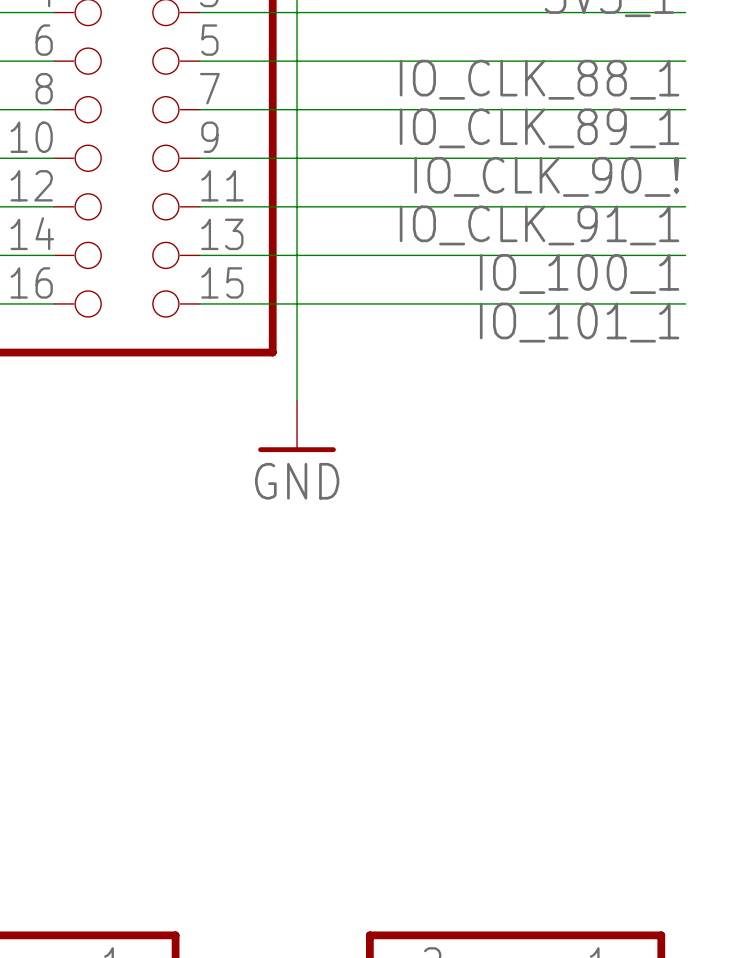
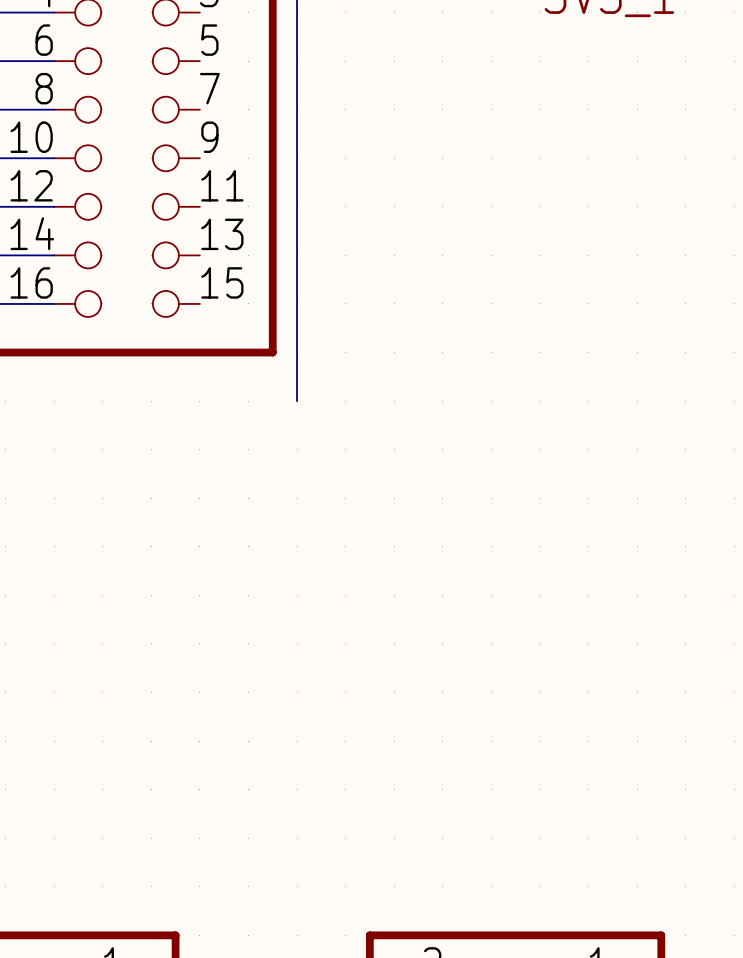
wire: (199, 12) (685, 12) -> none
wire: (199, 61) (685, 61) -> none
label: IO_CLK_88_1 (539, 79) -> none
wire: (199, 109) (685, 109) -> none
label: IO_CLK_89_1 (539, 128) -> none
wire: (199, 158) (685, 158) -> none
label: IO_CLK_90_! (546, 176) -> none
wire: (199, 206) (685, 206) -> none
label: IO_CLK_91_1 (539, 225) -> none
wire: (199, 255) (685, 255) -> none
label: IO_100_1 (579, 274) -> none
wire: (199, 303) (685, 303) -> none
label: IO_101_1 (579, 322) -> none
power symbol: GND (297, 426) -> none

